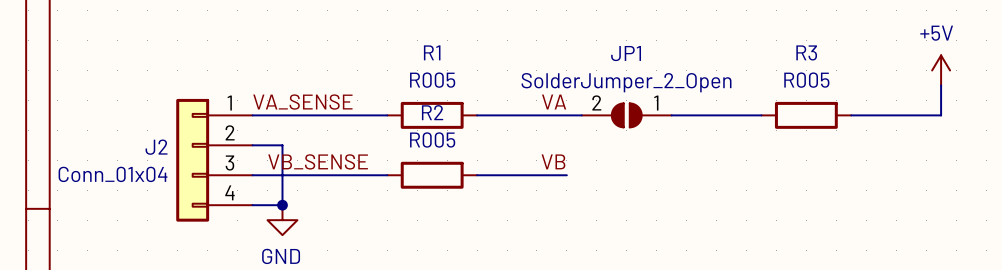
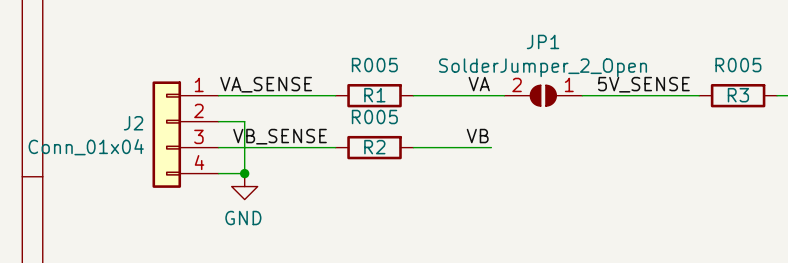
R1 name position: R1 (432, 52) -> R1 (374, 95)
R3 name position: R3 (806, 52) -> R3 (738, 95)
label: none -> 5V_SENSE (643, 84)
R2 name position: R2 (432, 112) -> R2 (374, 147)
R3 position: (806, 115) -> (738, 95)
wire: (851, 115) (896, 115) -> (660, 95) (699, 95)

